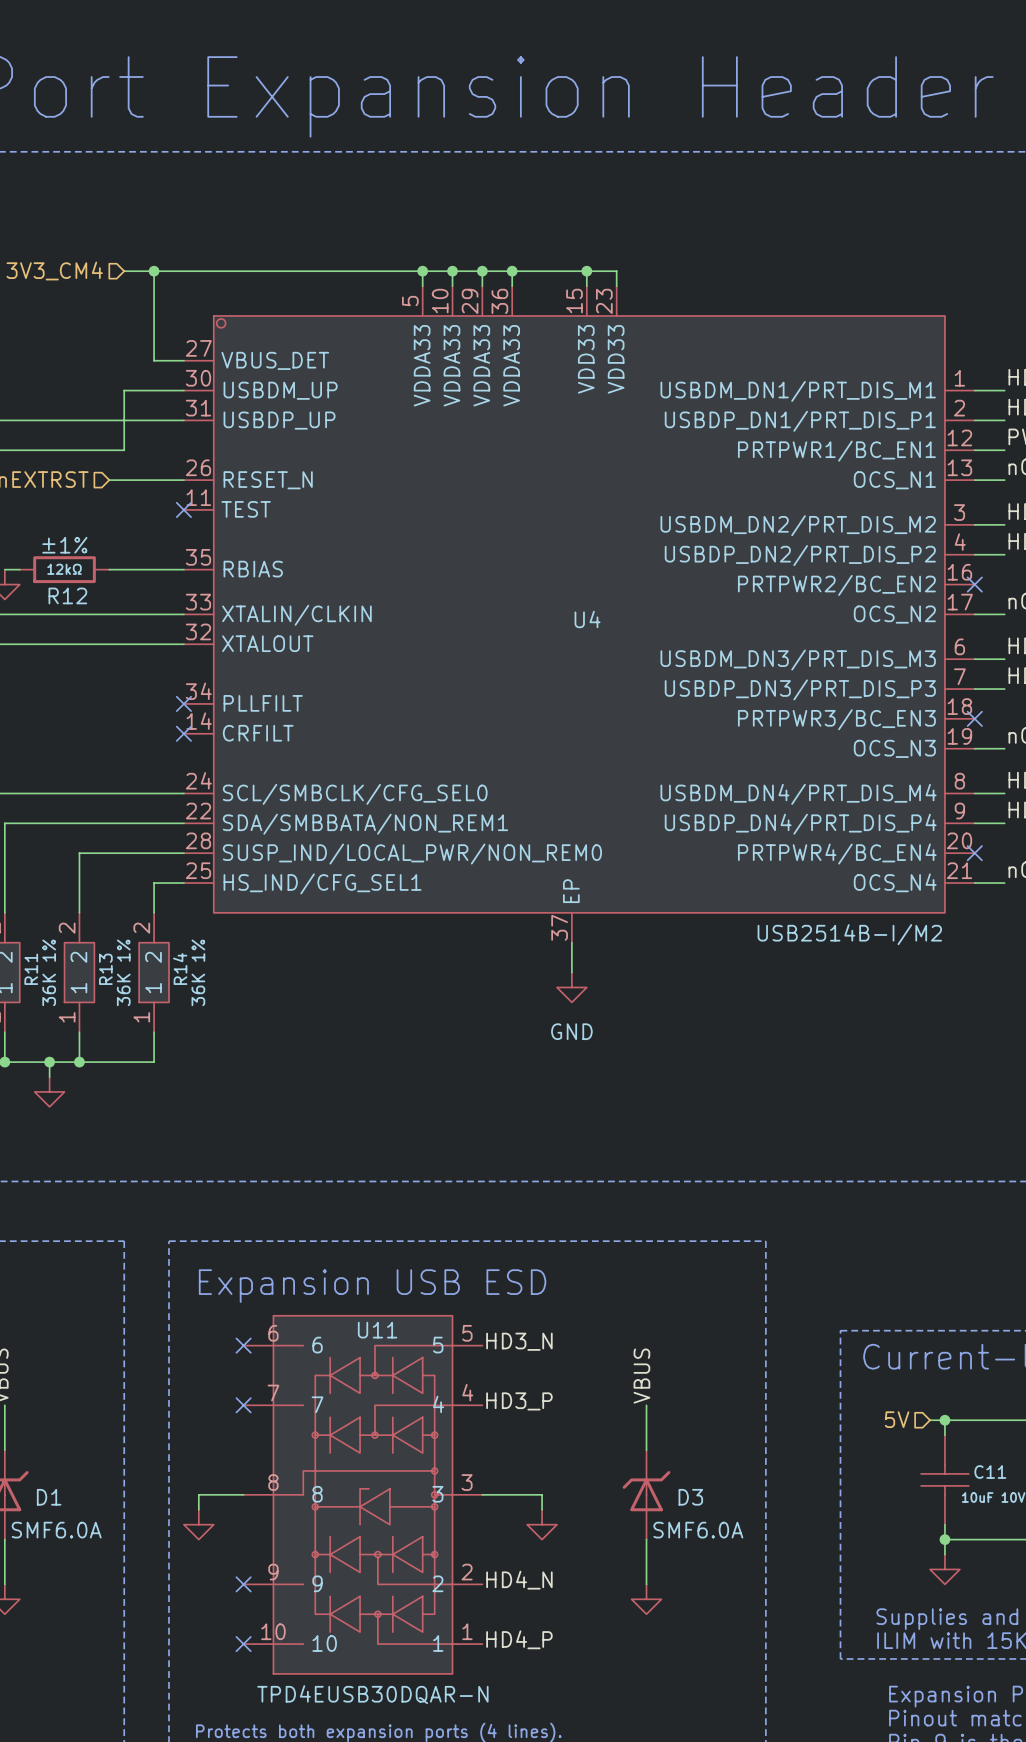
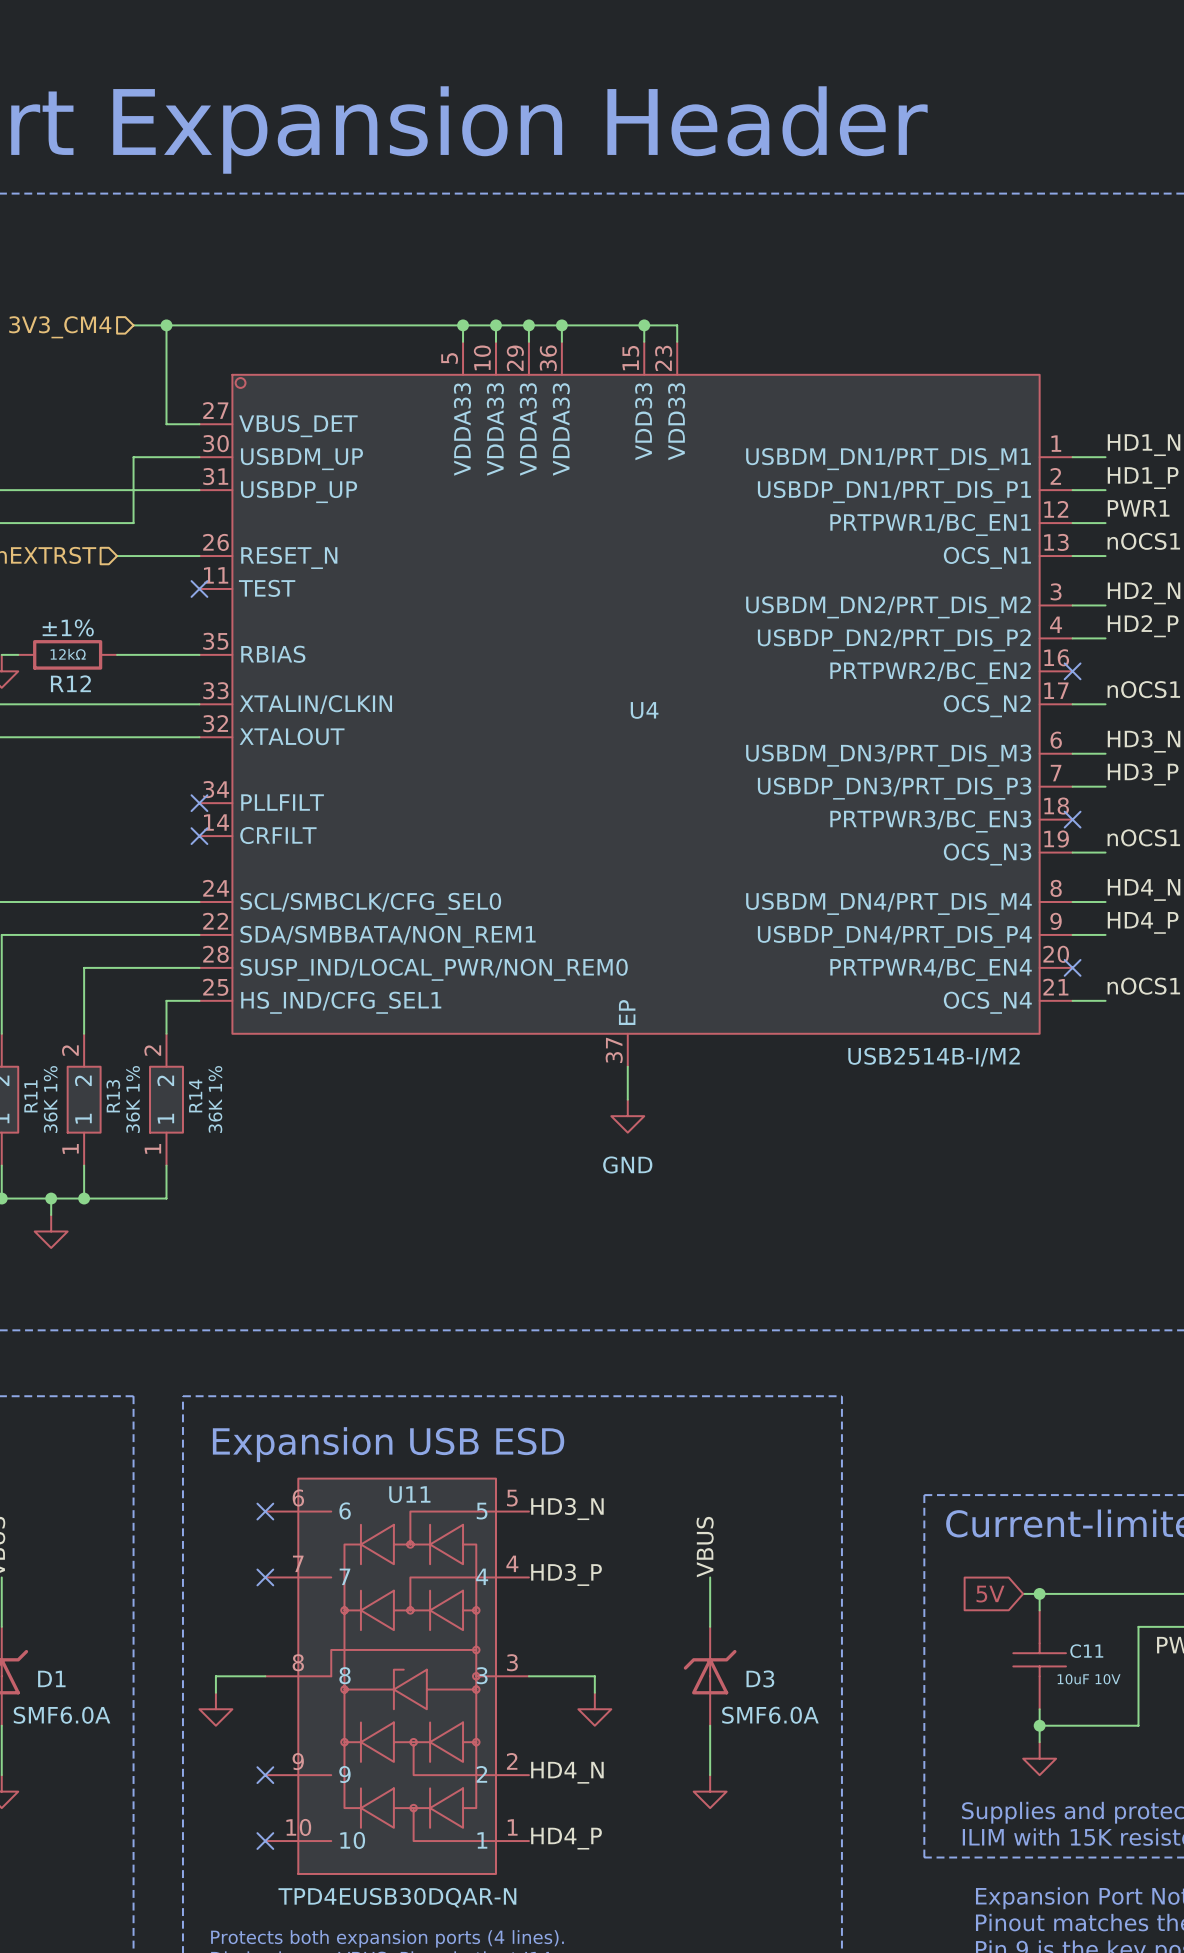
hierarchical label: 5V (897, 1419) -> none
global label: none -> 5V (990, 1594)

